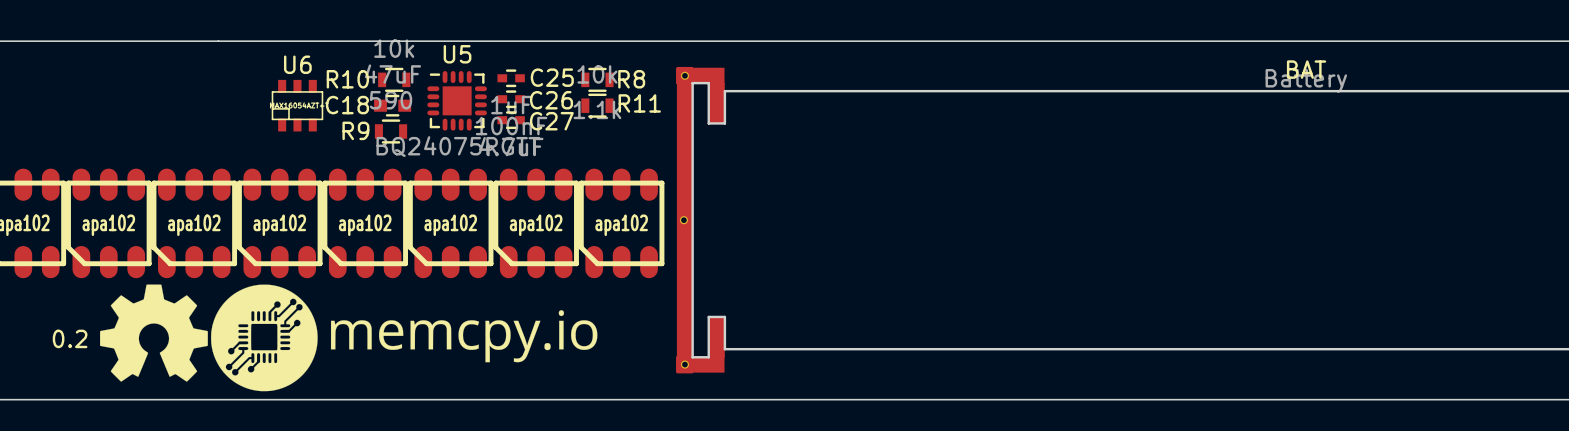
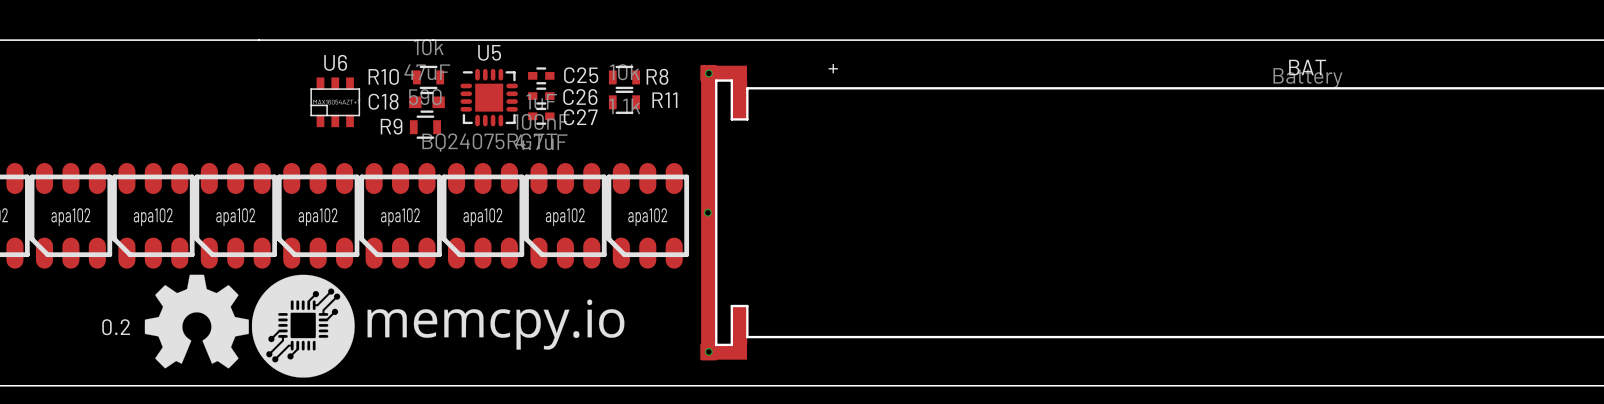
BAT text: none -> + (833, 68)

